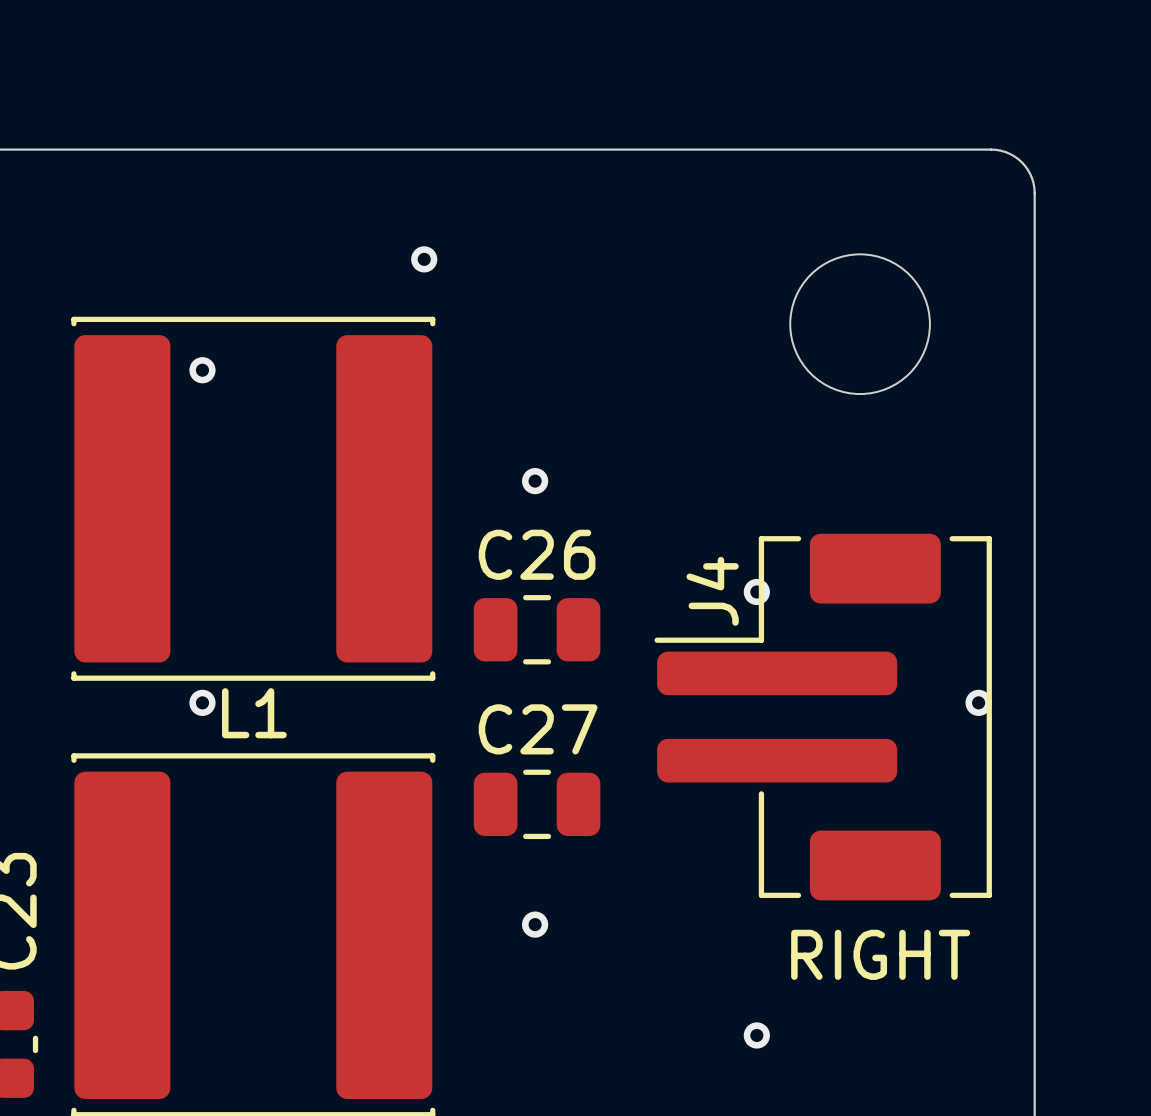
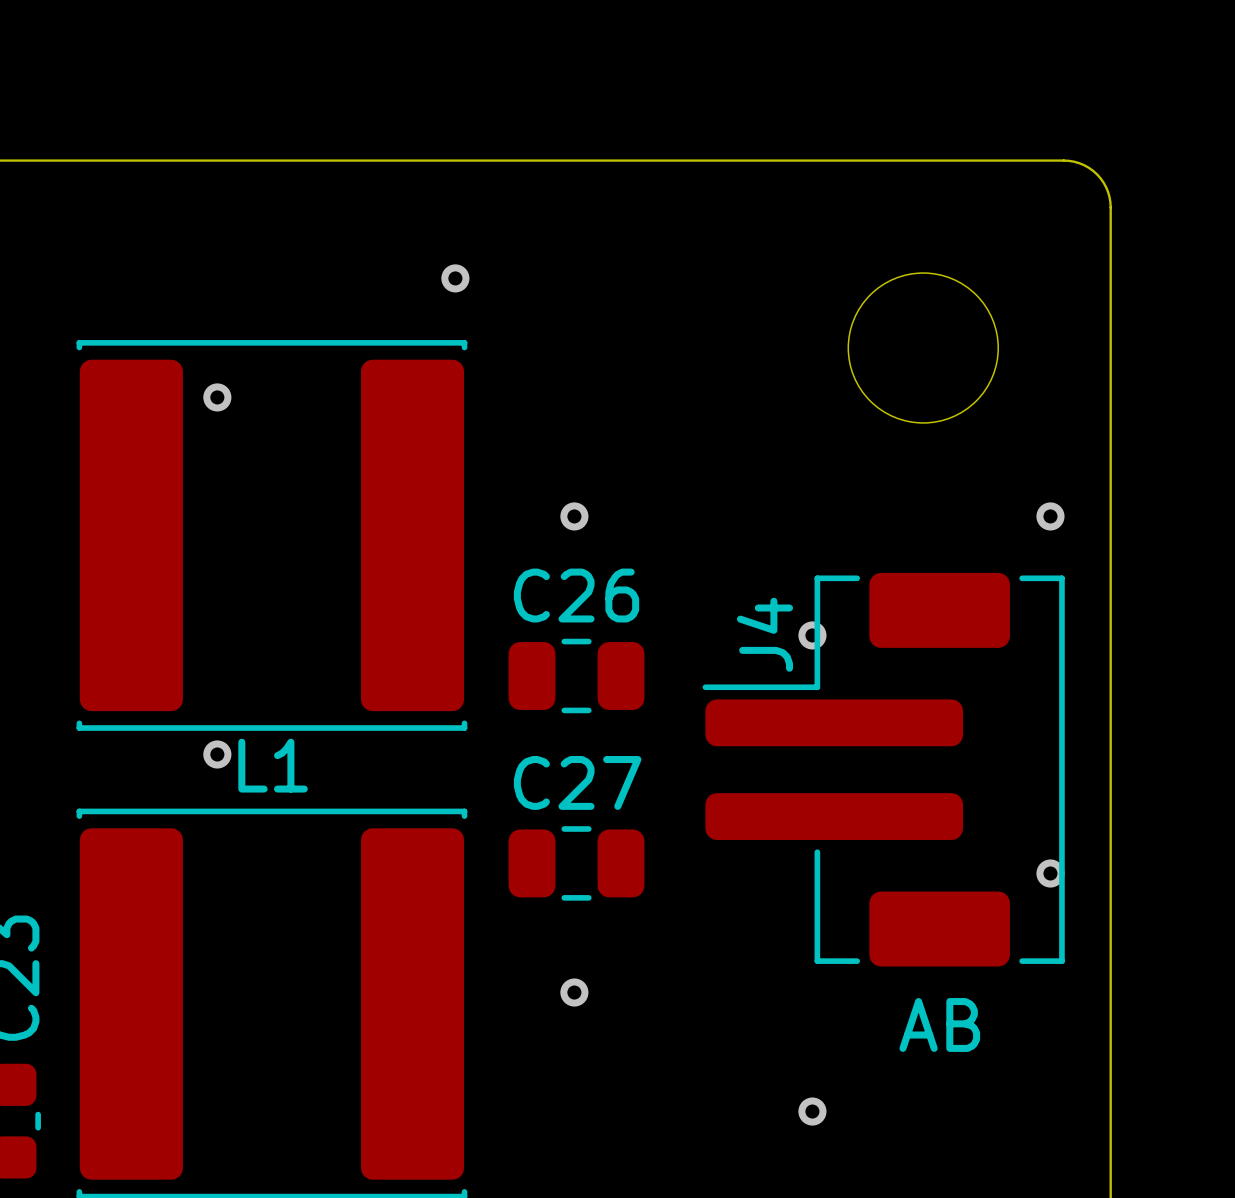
via: none -> (1050, 516)
via: (978, 702) -> none
via: none -> (1050, 873)
J4 value: RIGHT (880, 954) -> AB (939, 1024)

